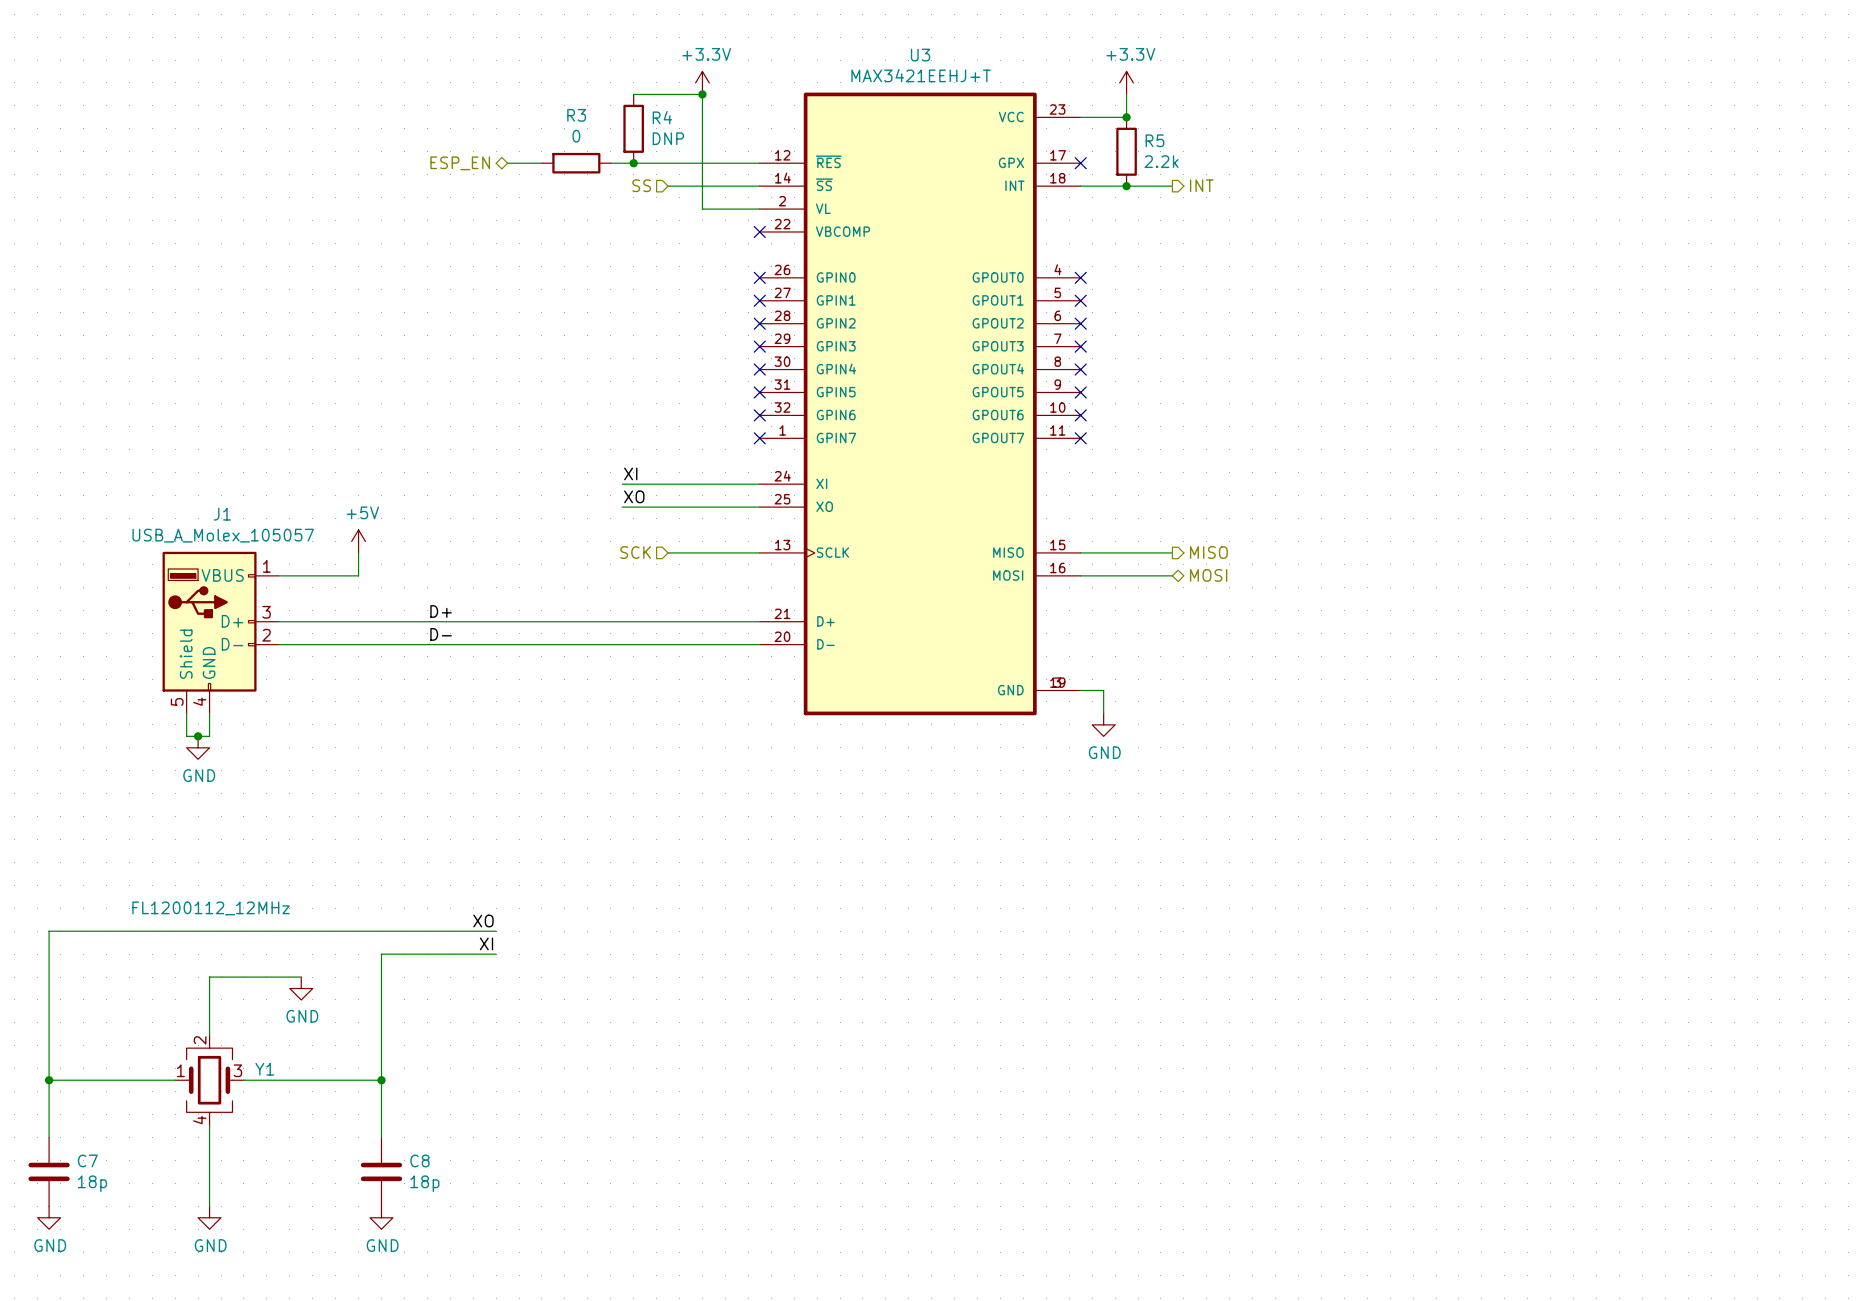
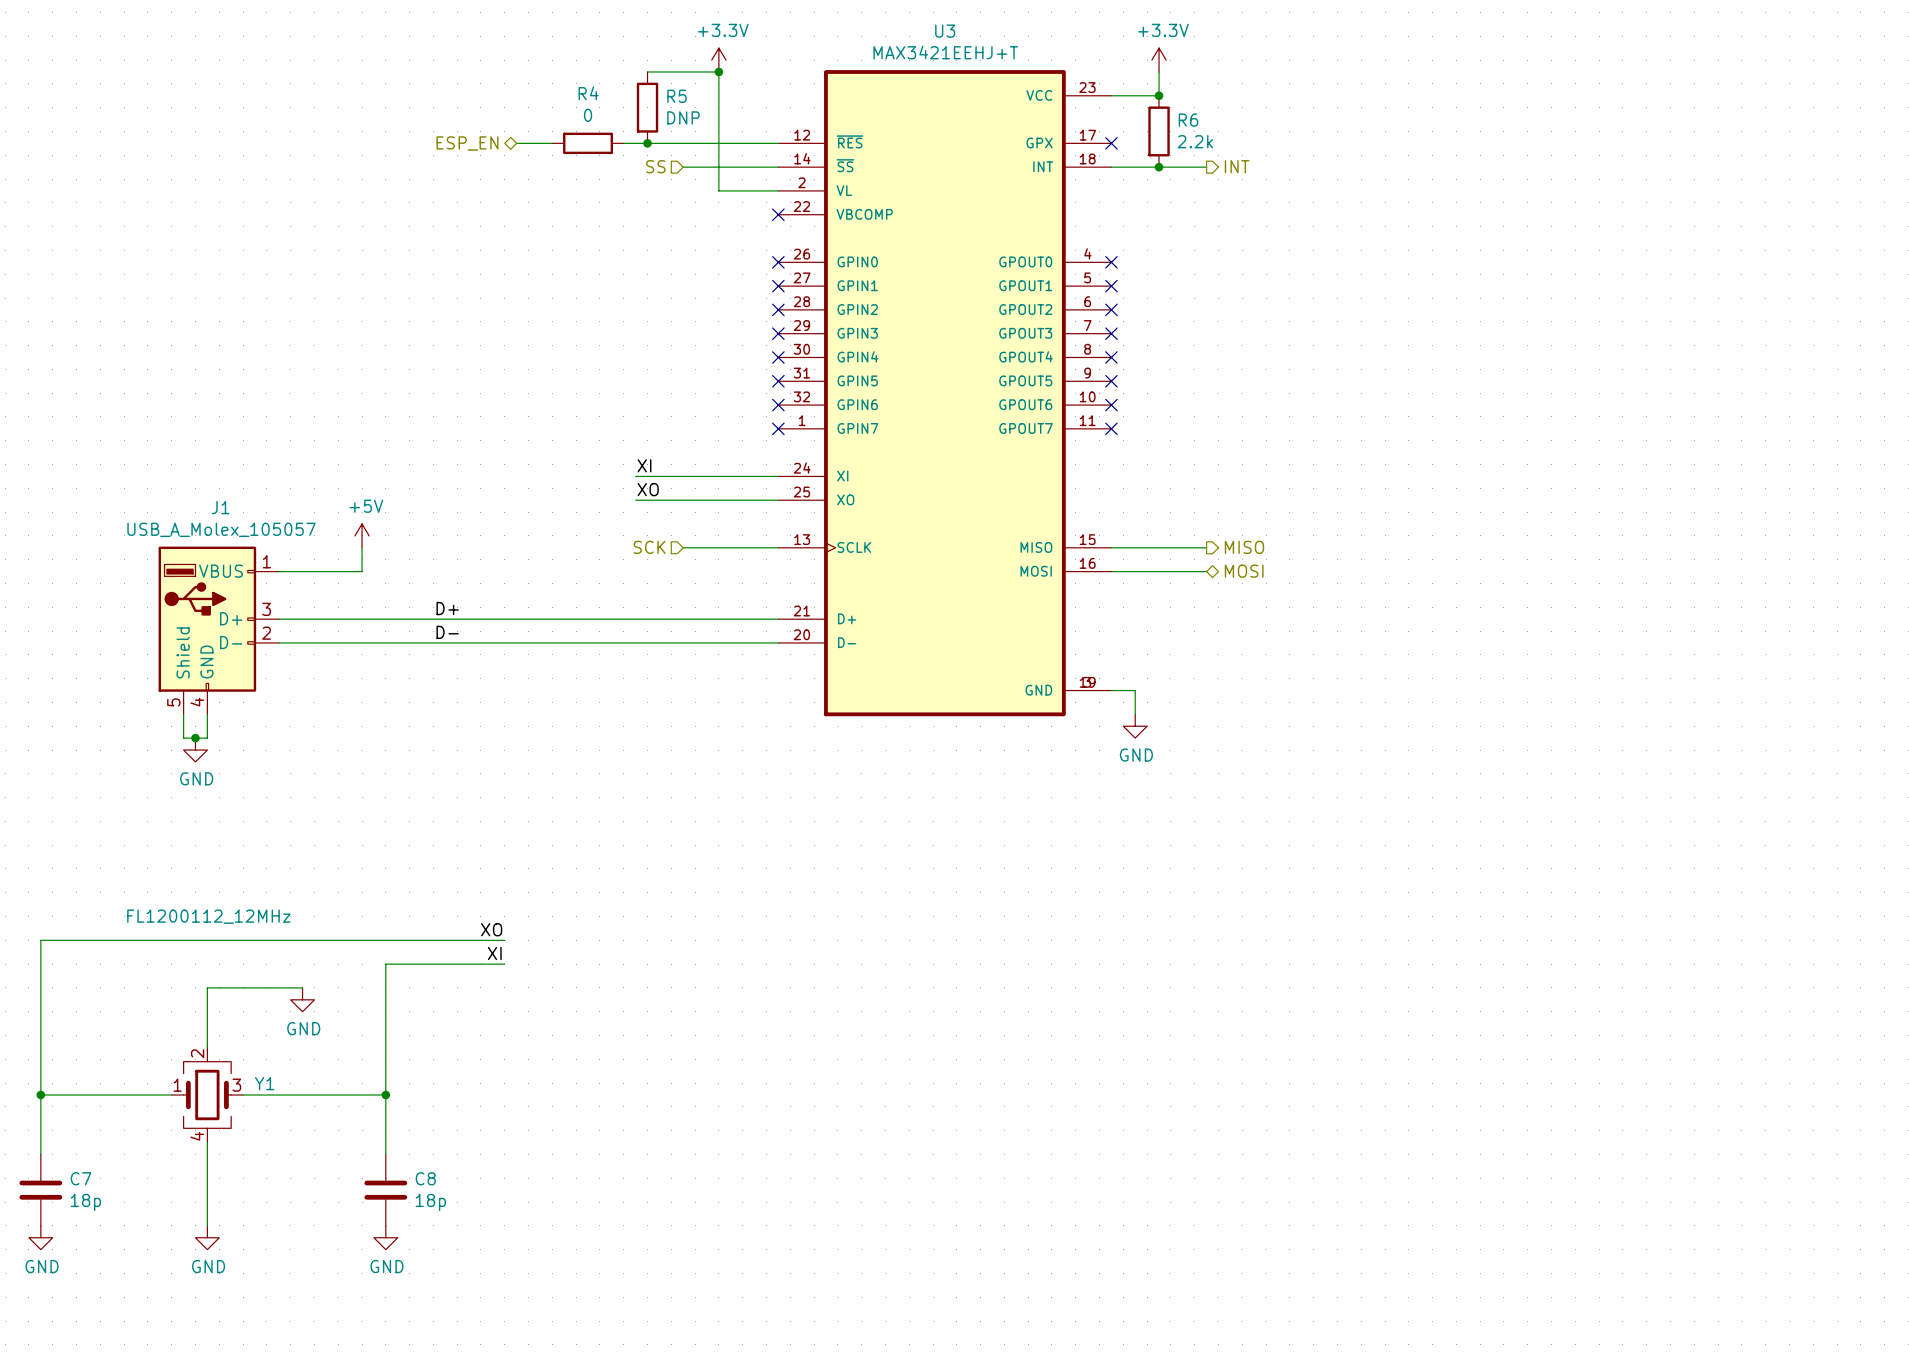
R3 name: R3 (576, 115) -> R4 (588, 93)
R4 name: R4 (662, 117) -> R5 (677, 96)
R5 name: R5 (1154, 140) -> R6 (1188, 120)

